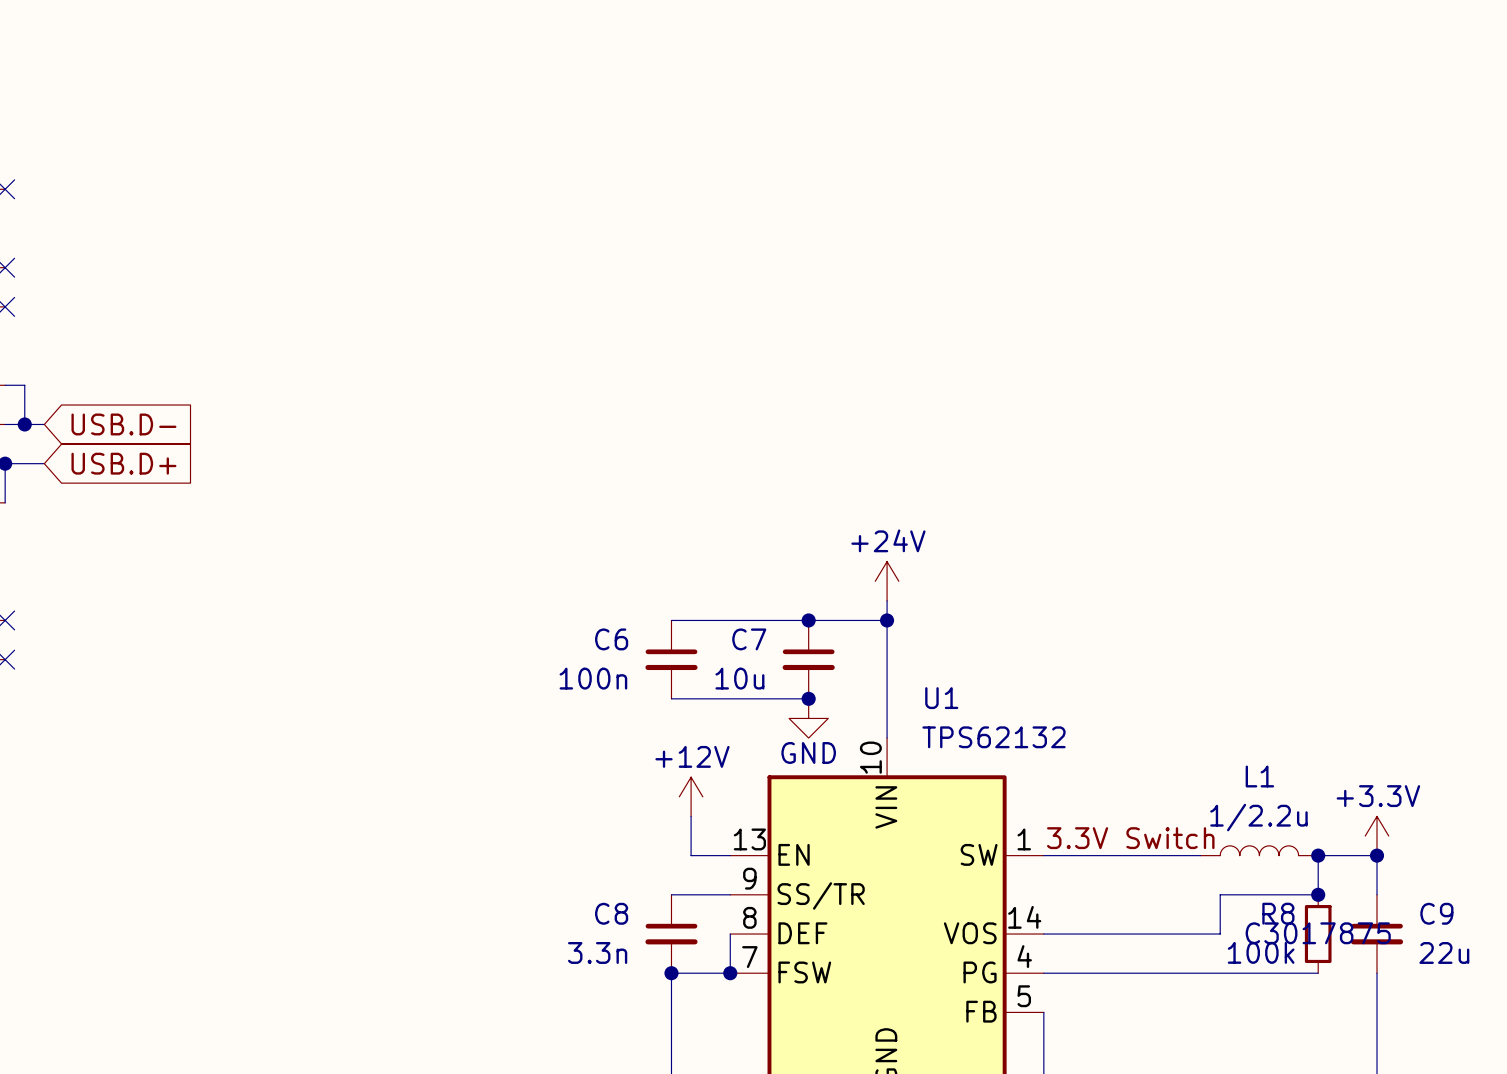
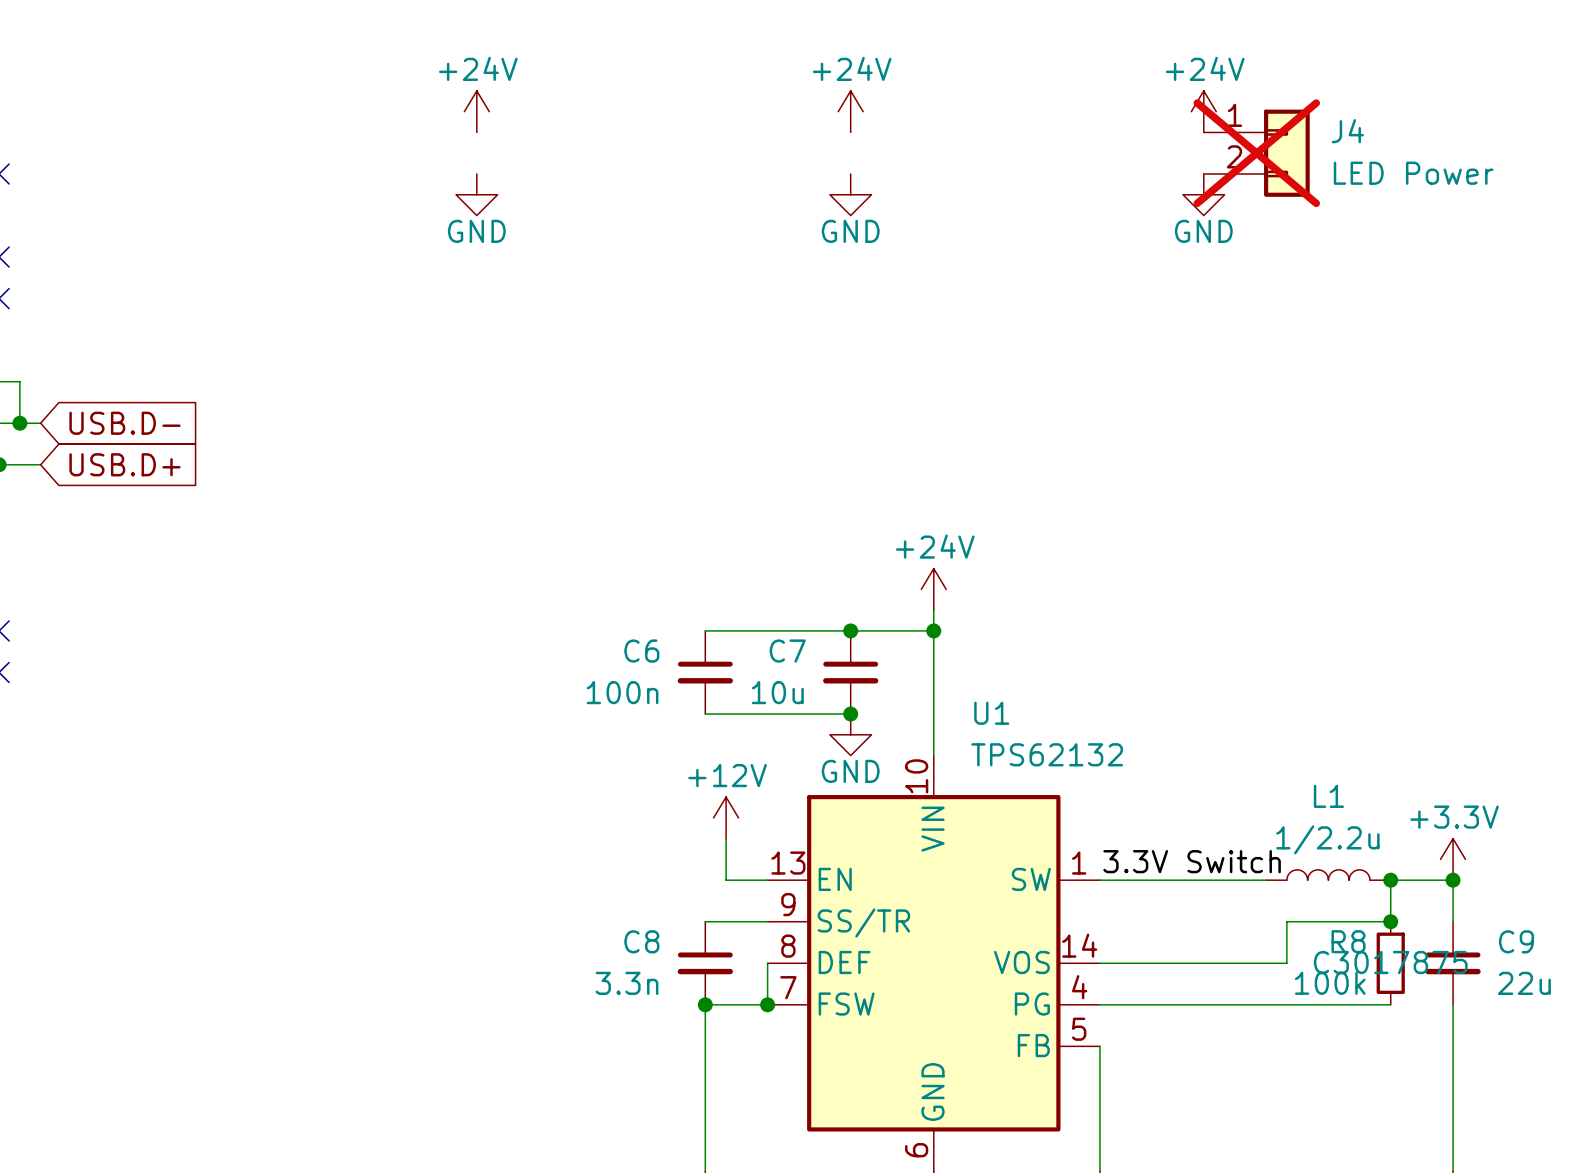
power symbol: none -> +24V (476, 111)
power symbol: none -> +24V (850, 111)
power symbol: none -> +24V (1203, 111)
J4: none -> LED Power (1256, 153)
power symbol: none -> GND (476, 194)
power symbol: none -> GND (850, 194)
power symbol: none -> GND (1203, 194)

